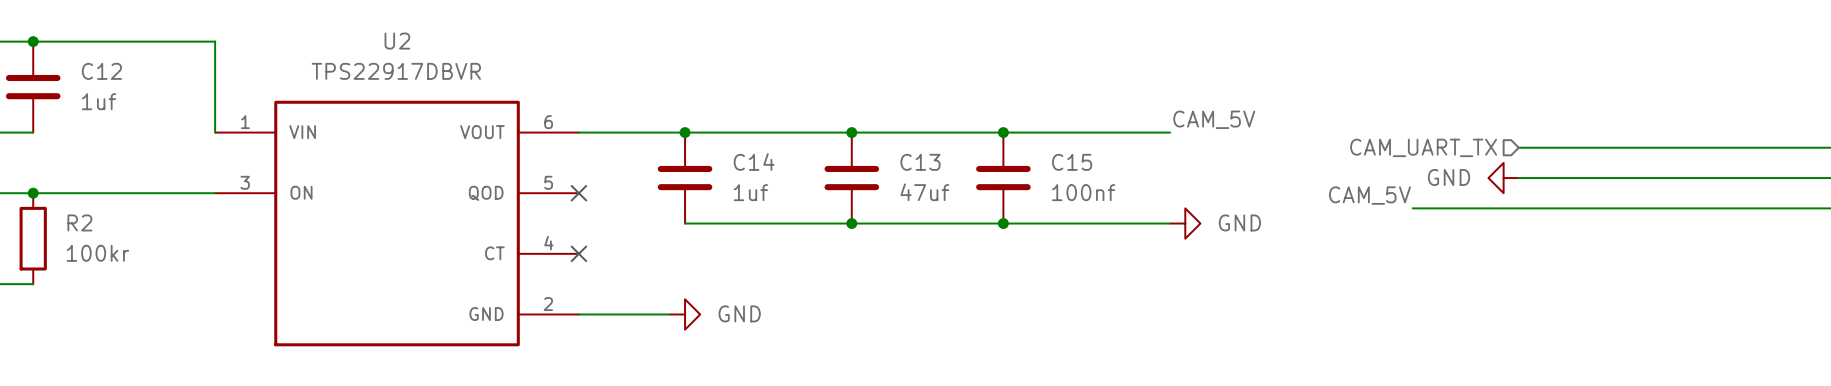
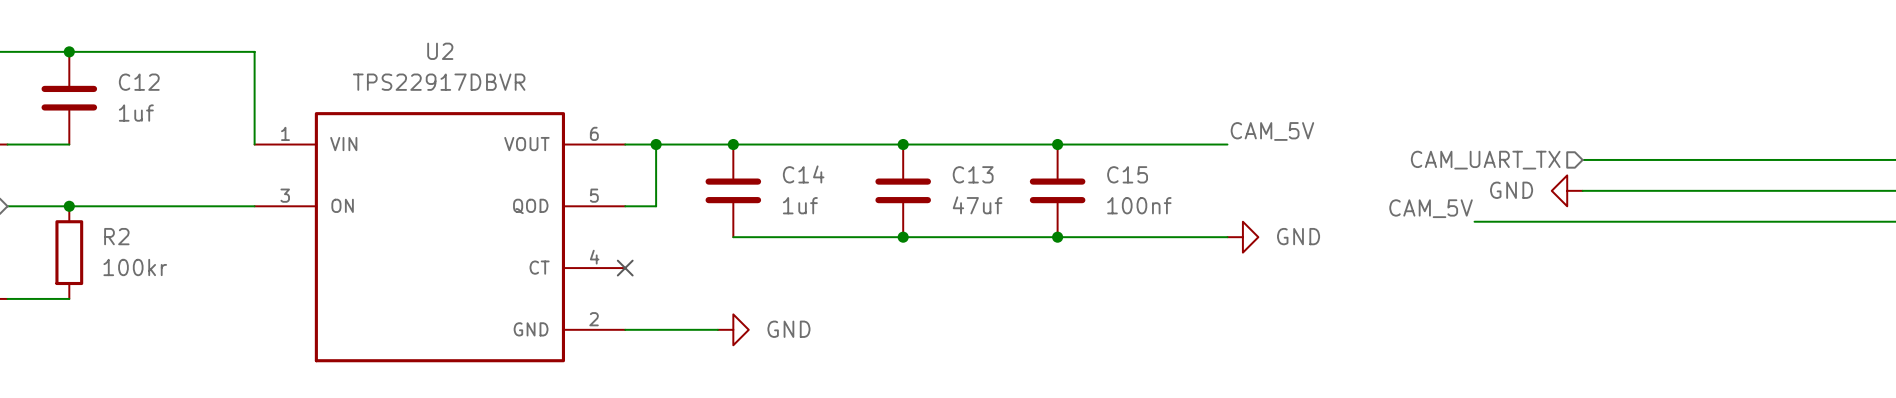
wire: none -> (656, 144) (656, 206) (625, 206)
junction: none -> (656, 144)
no-connect mark: (578, 193) -> none

